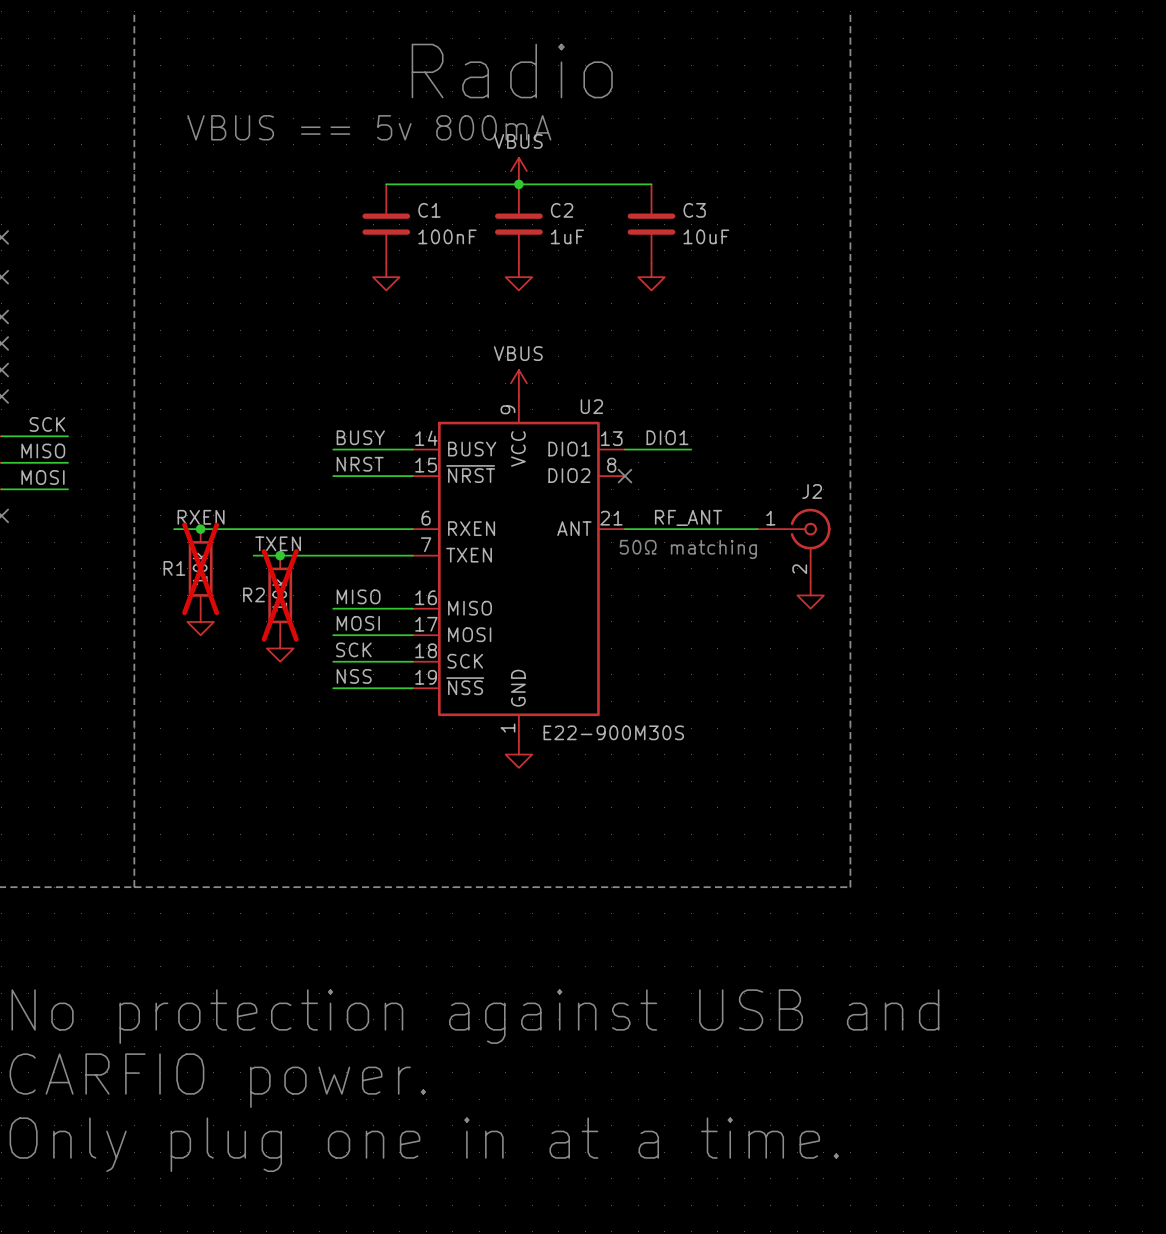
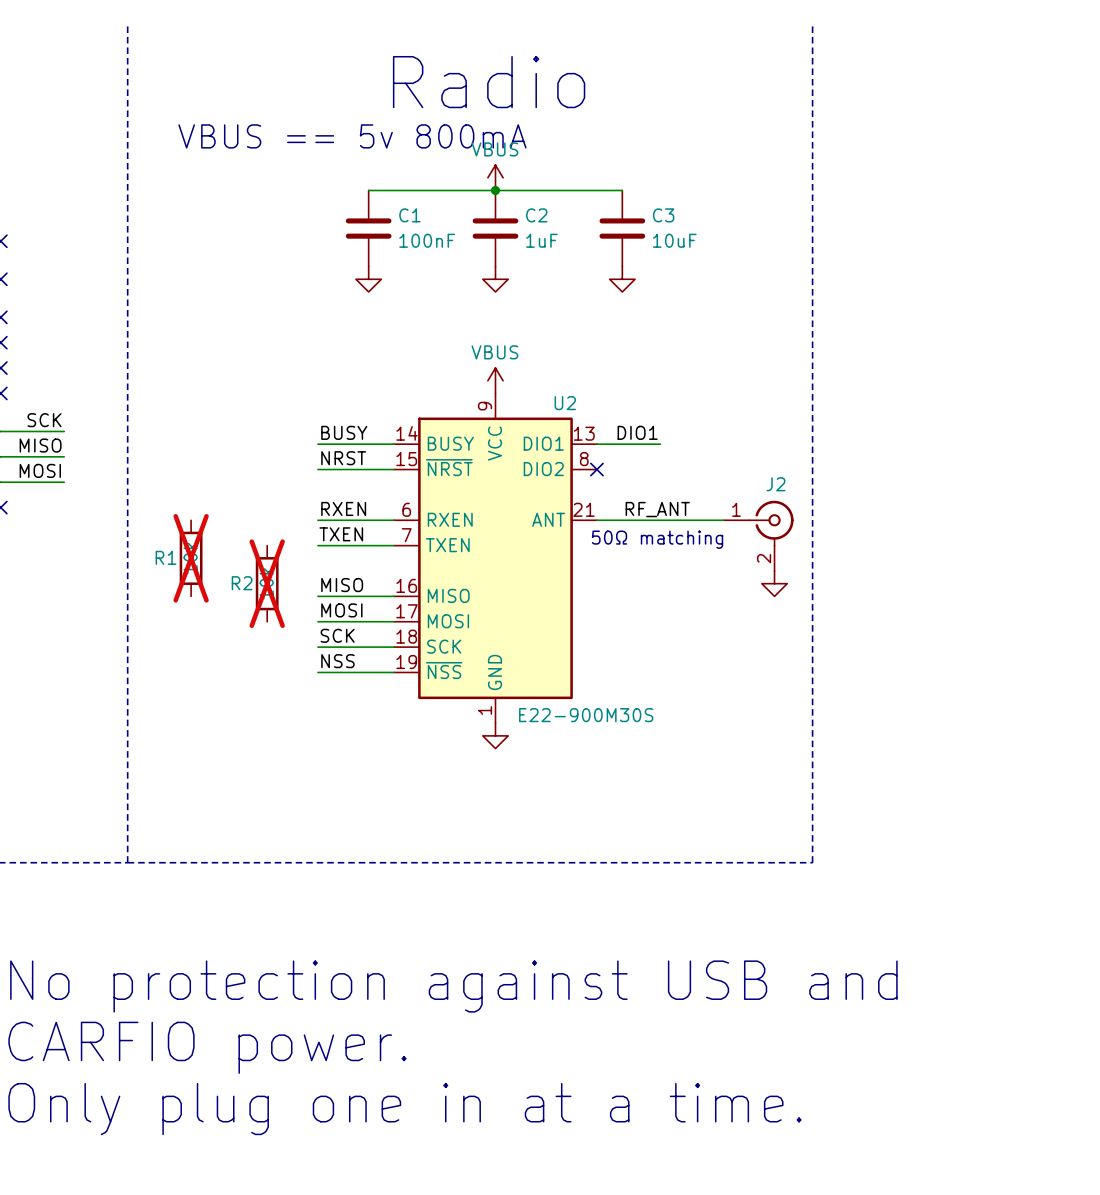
label position: RXEN (201, 517) -> RXEN (343, 508)
wire: (174, 529) (333, 529) -> none
junction: (200, 529) -> none
label position: TXEN (278, 543) -> TXEN (341, 534)
wire: (253, 555) (333, 555) -> none
junction: (280, 555) -> none
power symbol: (200, 621) -> none
power symbol: (280, 648) -> none

